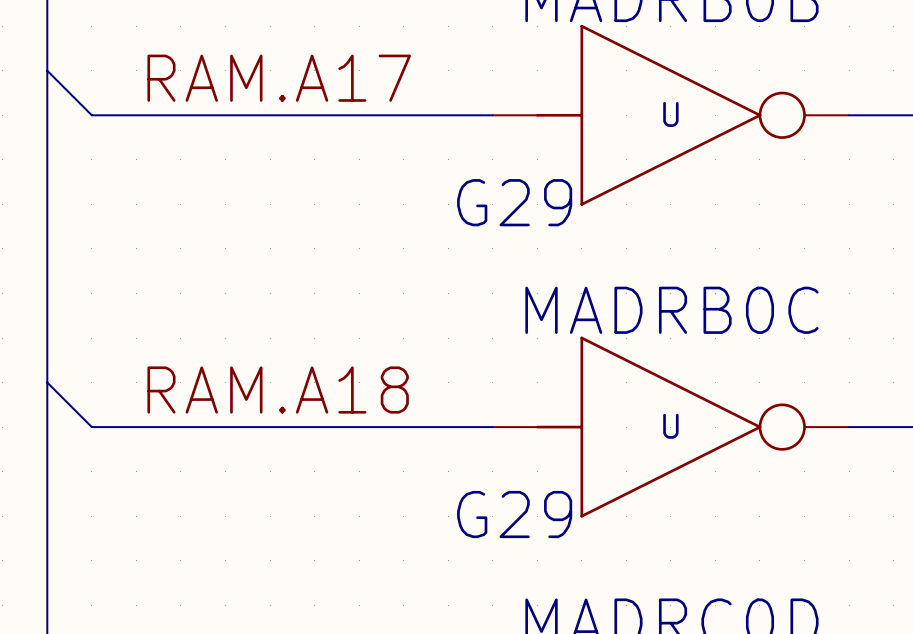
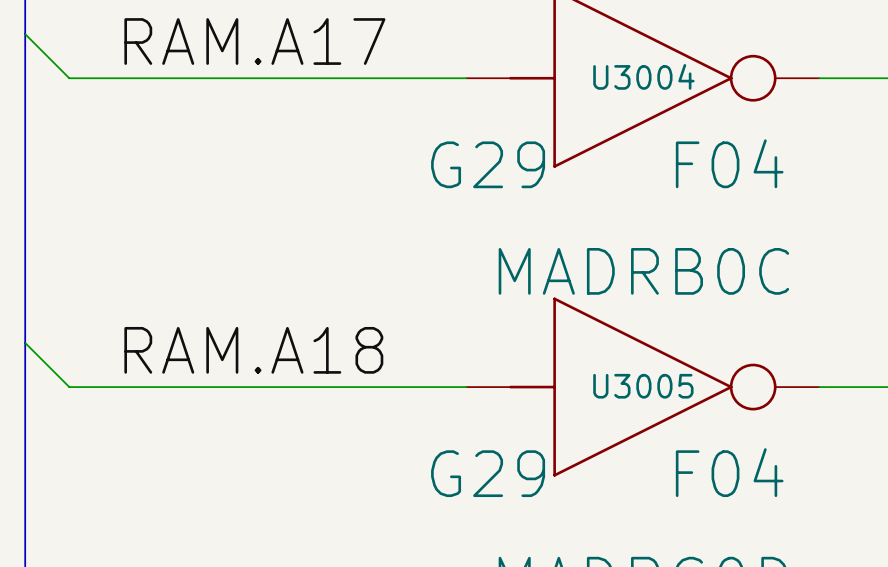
U name: U (670, 114) -> U3004 (643, 76)
U value: none -> F04 (729, 163)
U name: U (670, 426) -> U3005 (643, 386)
U value: none -> F04 (729, 472)

